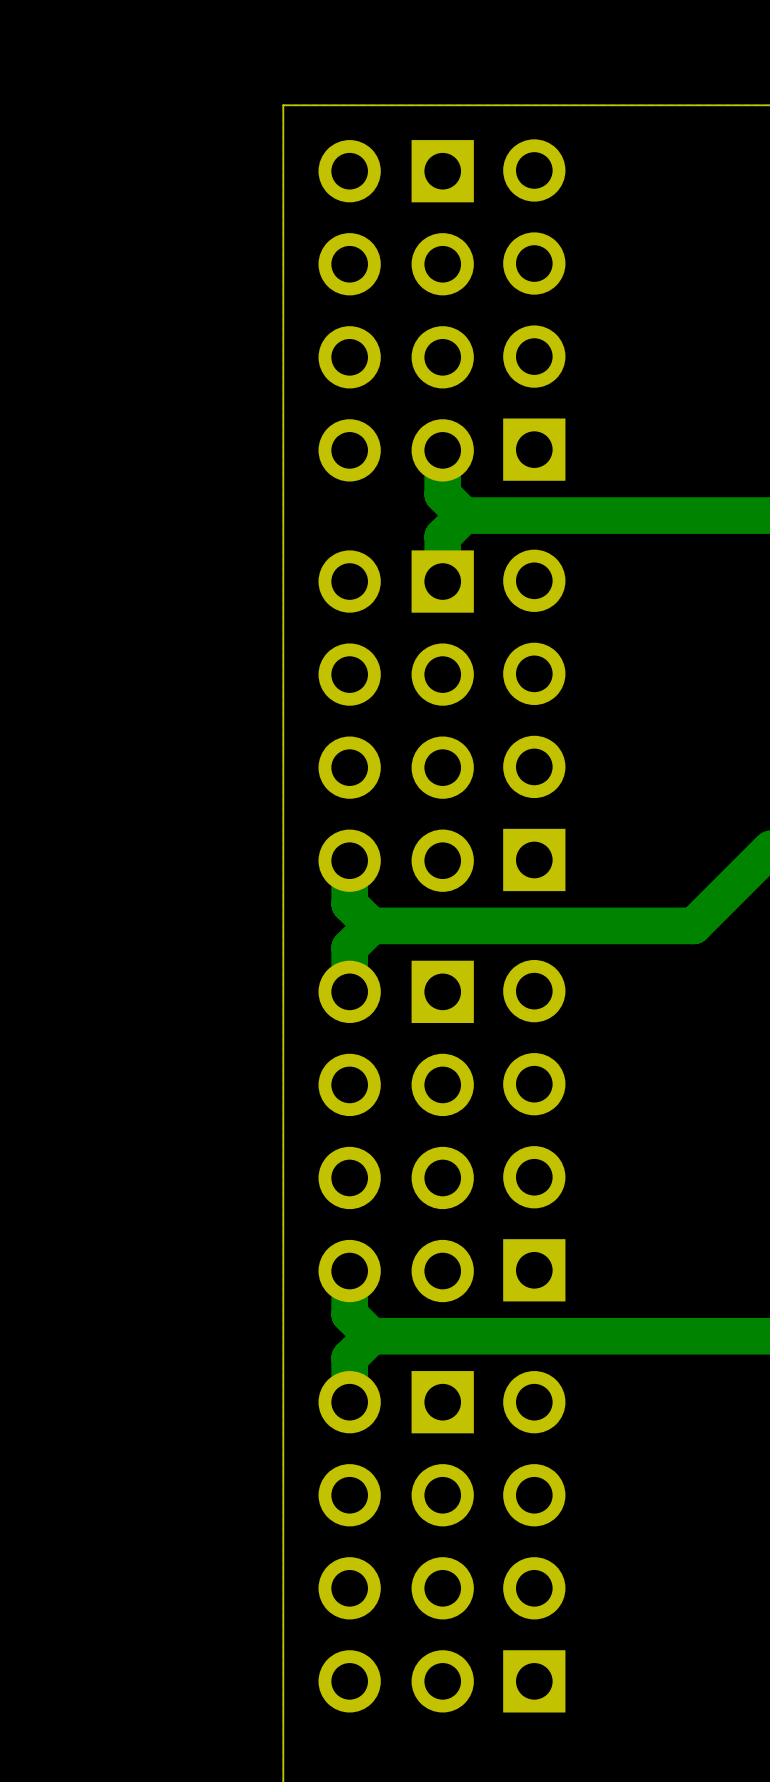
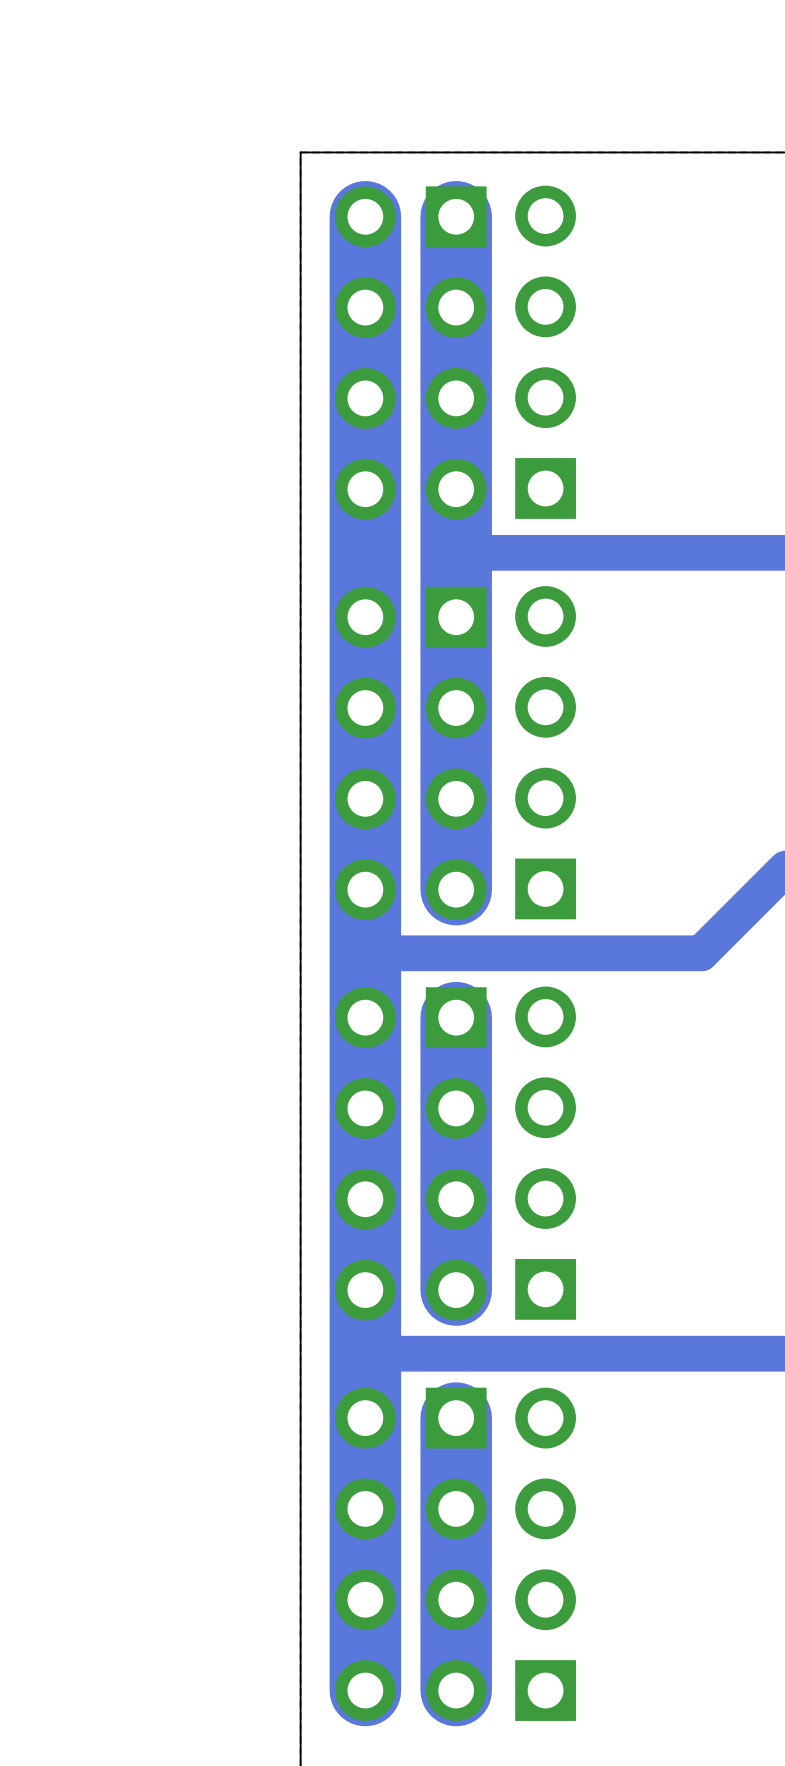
track: none -> (365, 216) (365, 1690)
track: none -> (456, 216) (456, 889)
track: none -> (456, 1017) (456, 1290)
track: none -> (456, 1418) (456, 1690)

